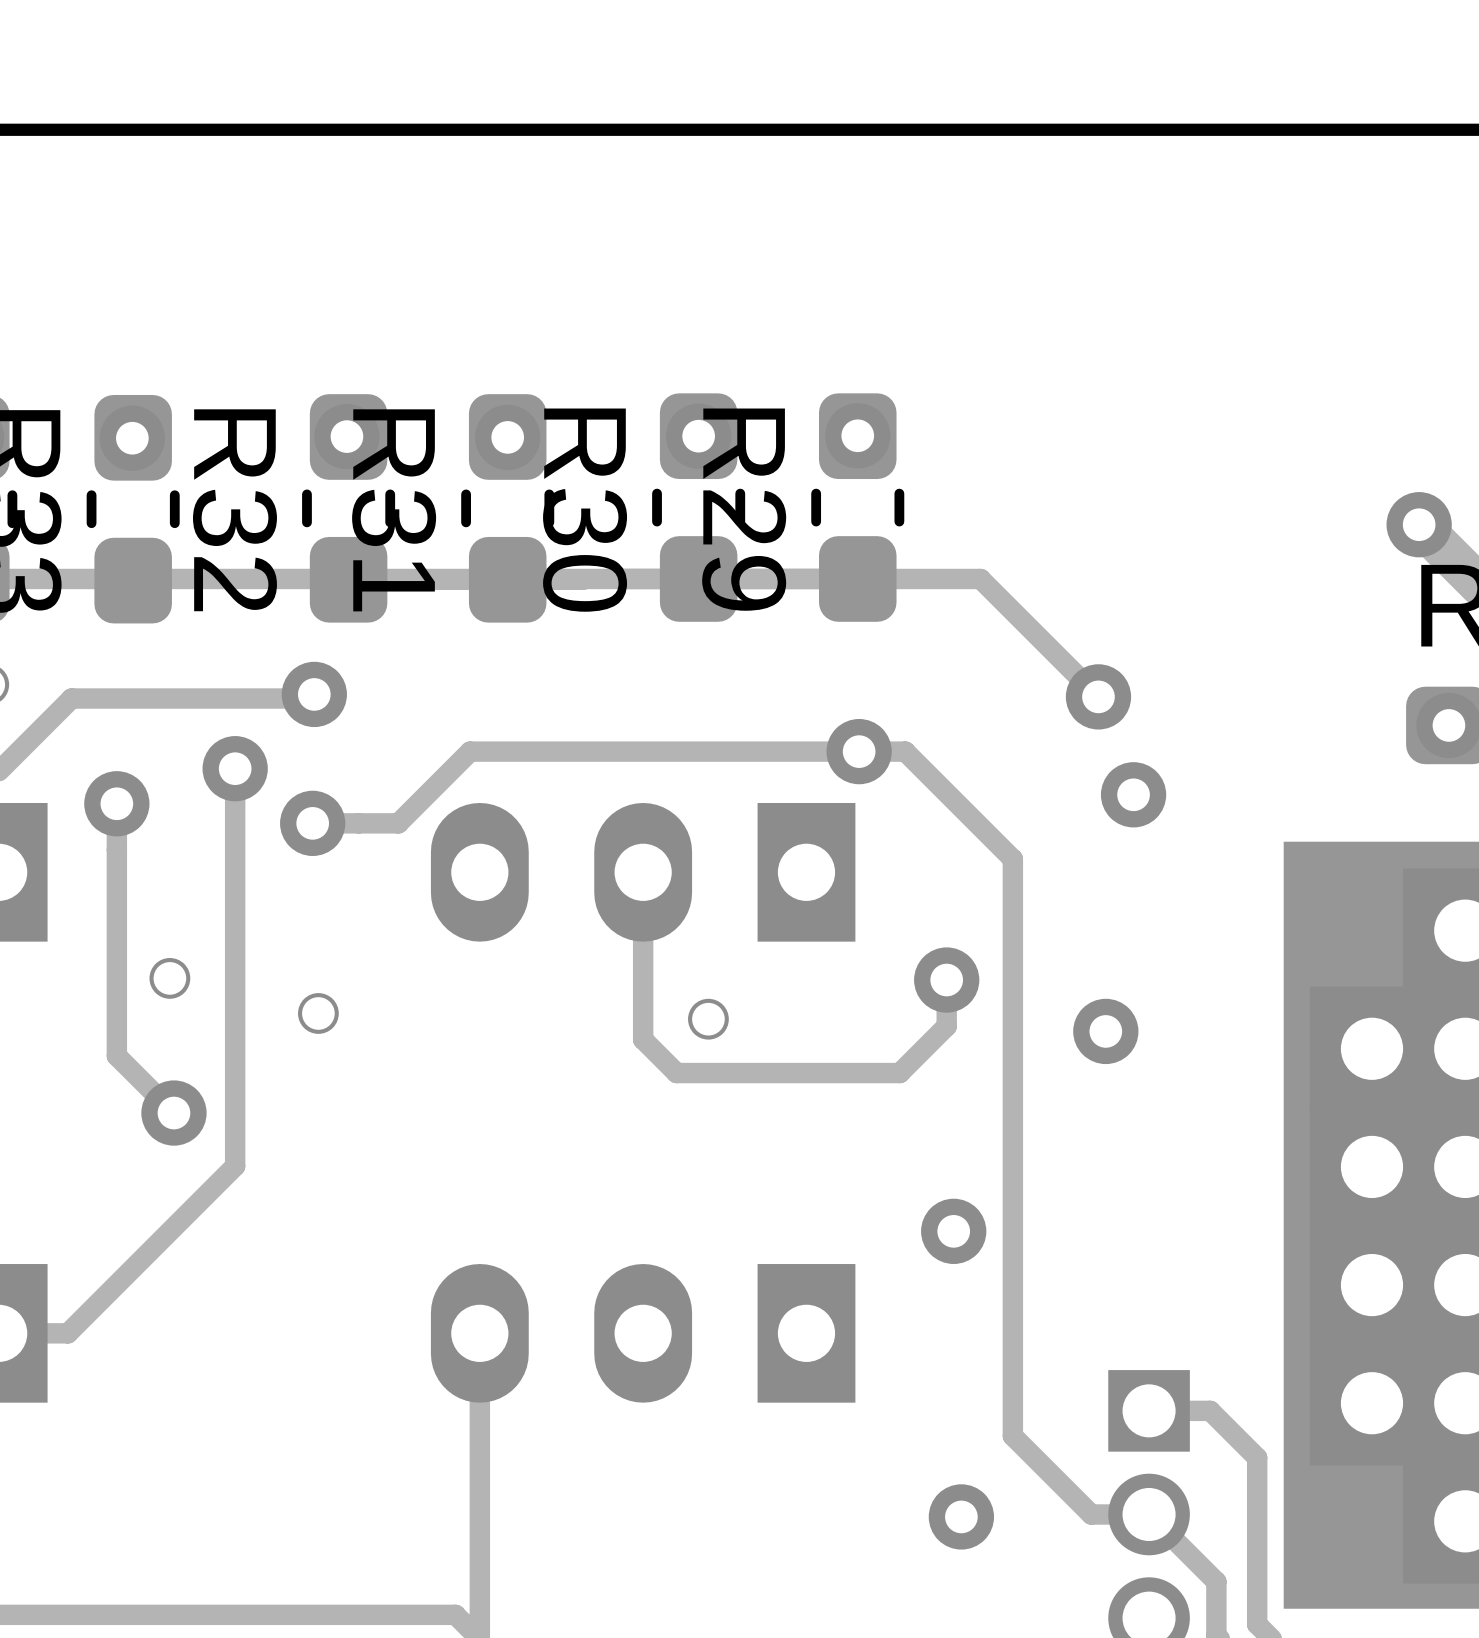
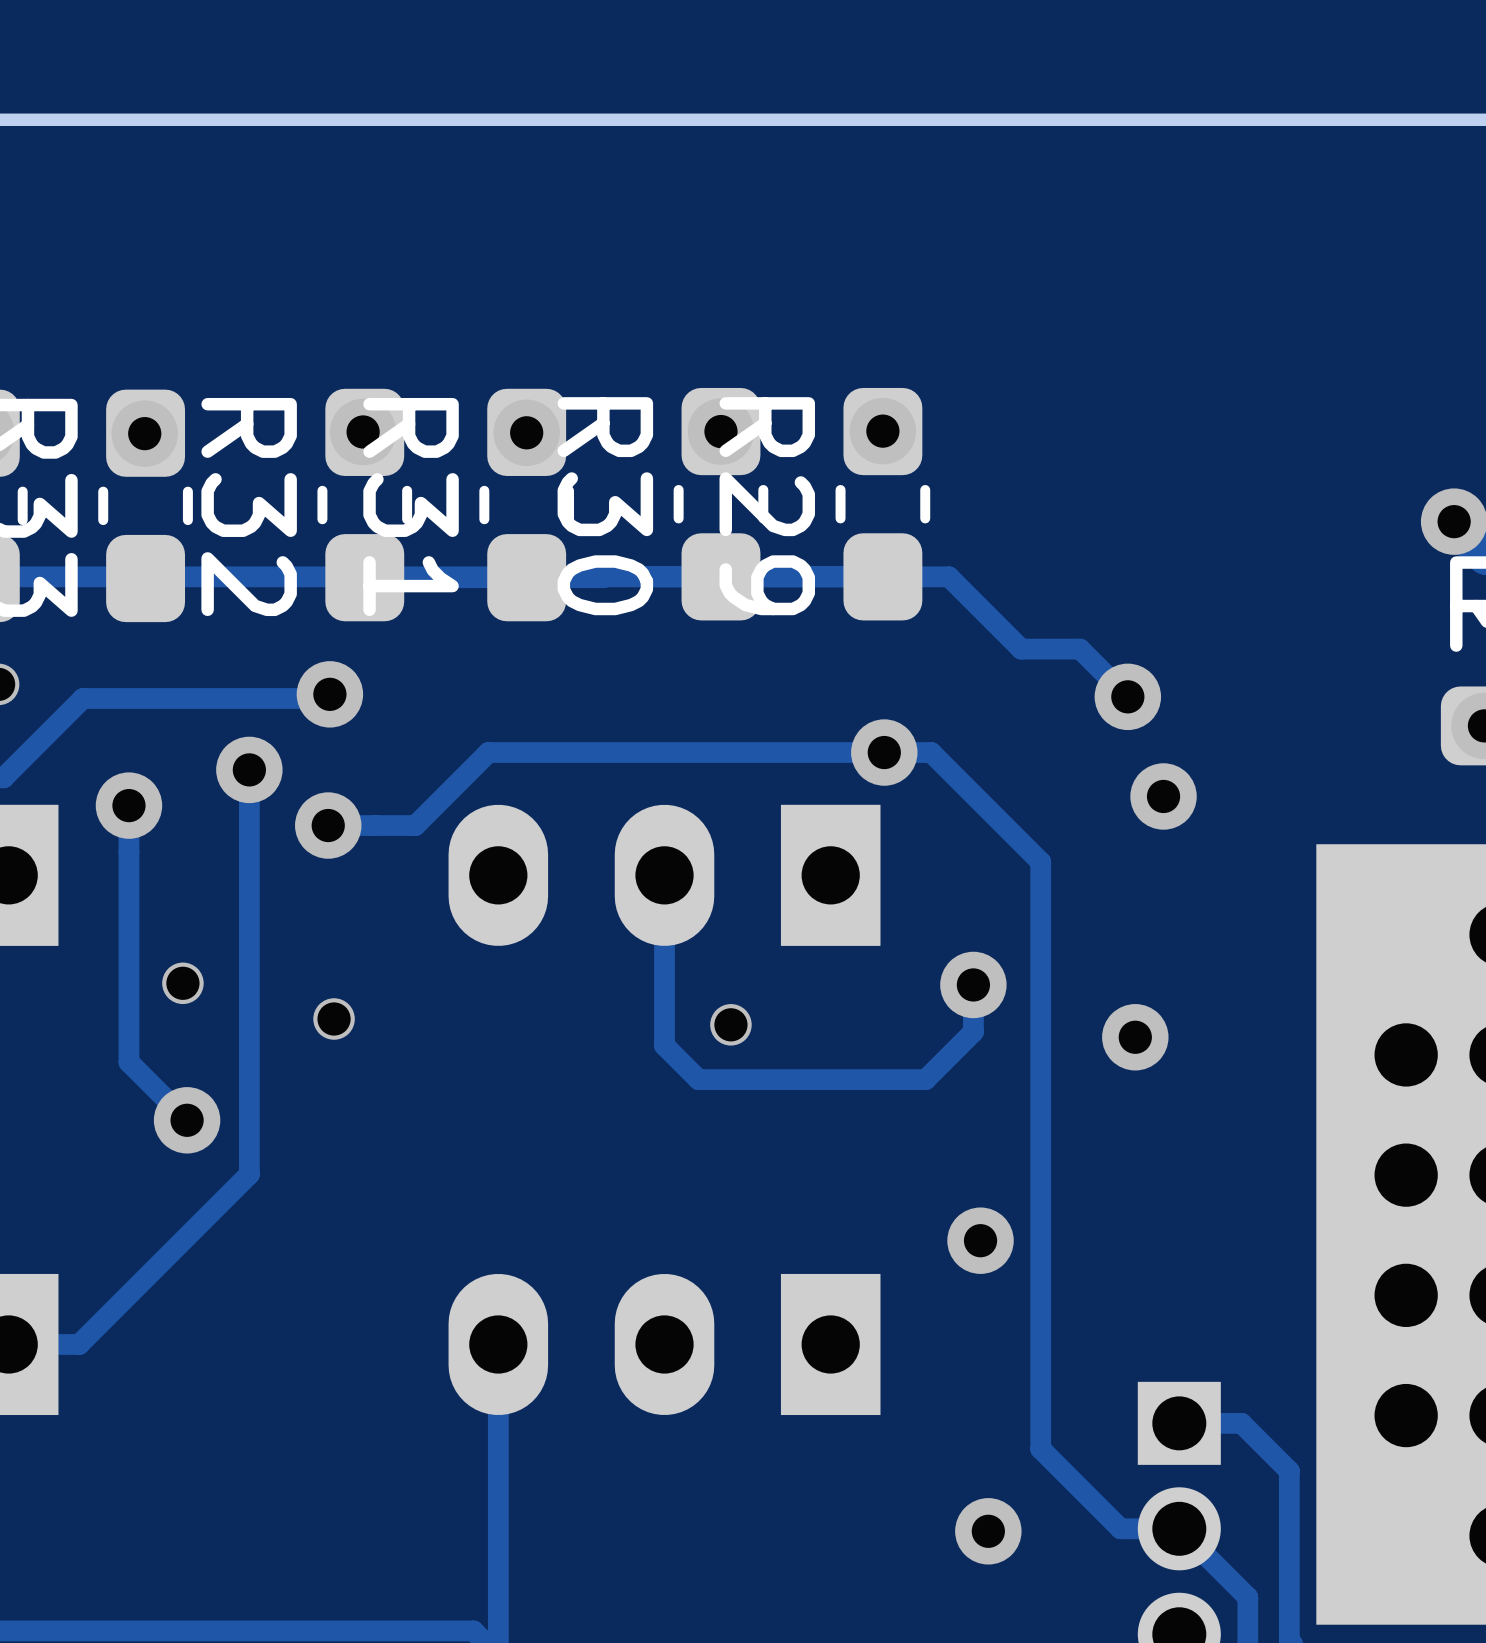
track: (922, 578) (980, 578) (1051, 649) -> (948, 576) (1021, 649) (1080, 649)

